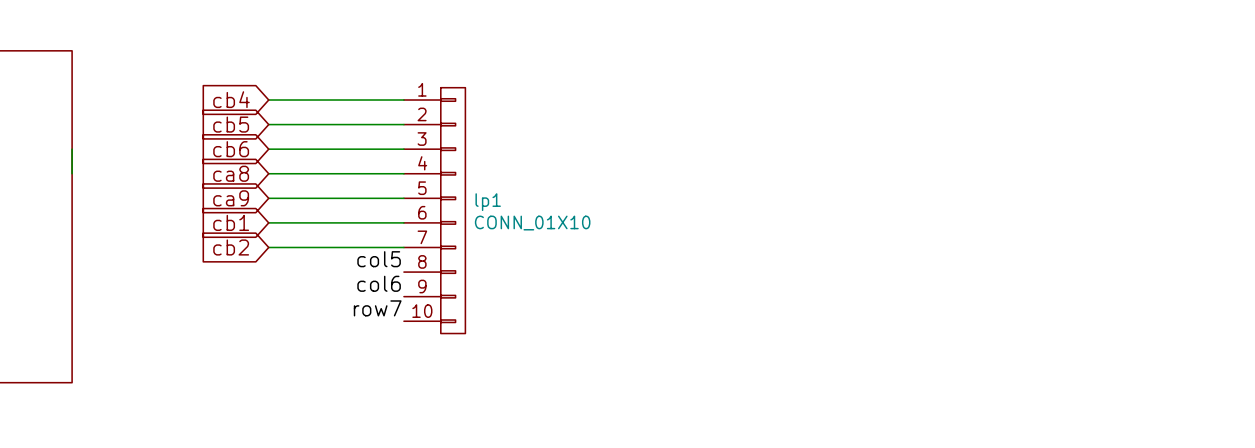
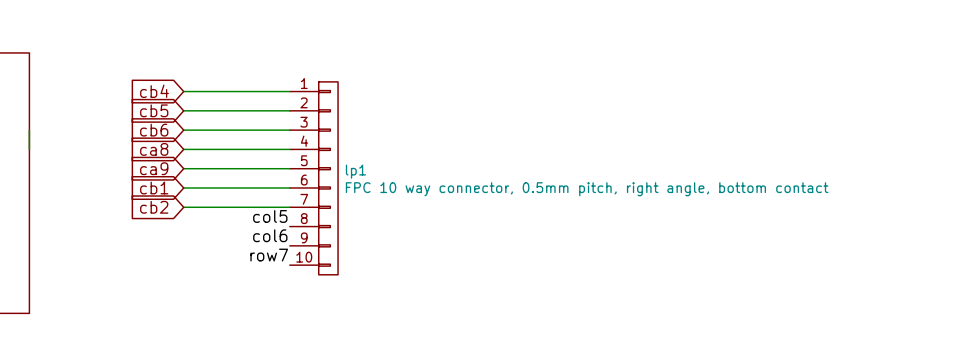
lp1 value: CONN_01X10 (532, 223) -> FPC 10 way connector, 0.5mm pitch, right angle, bottom contact (587, 189)

